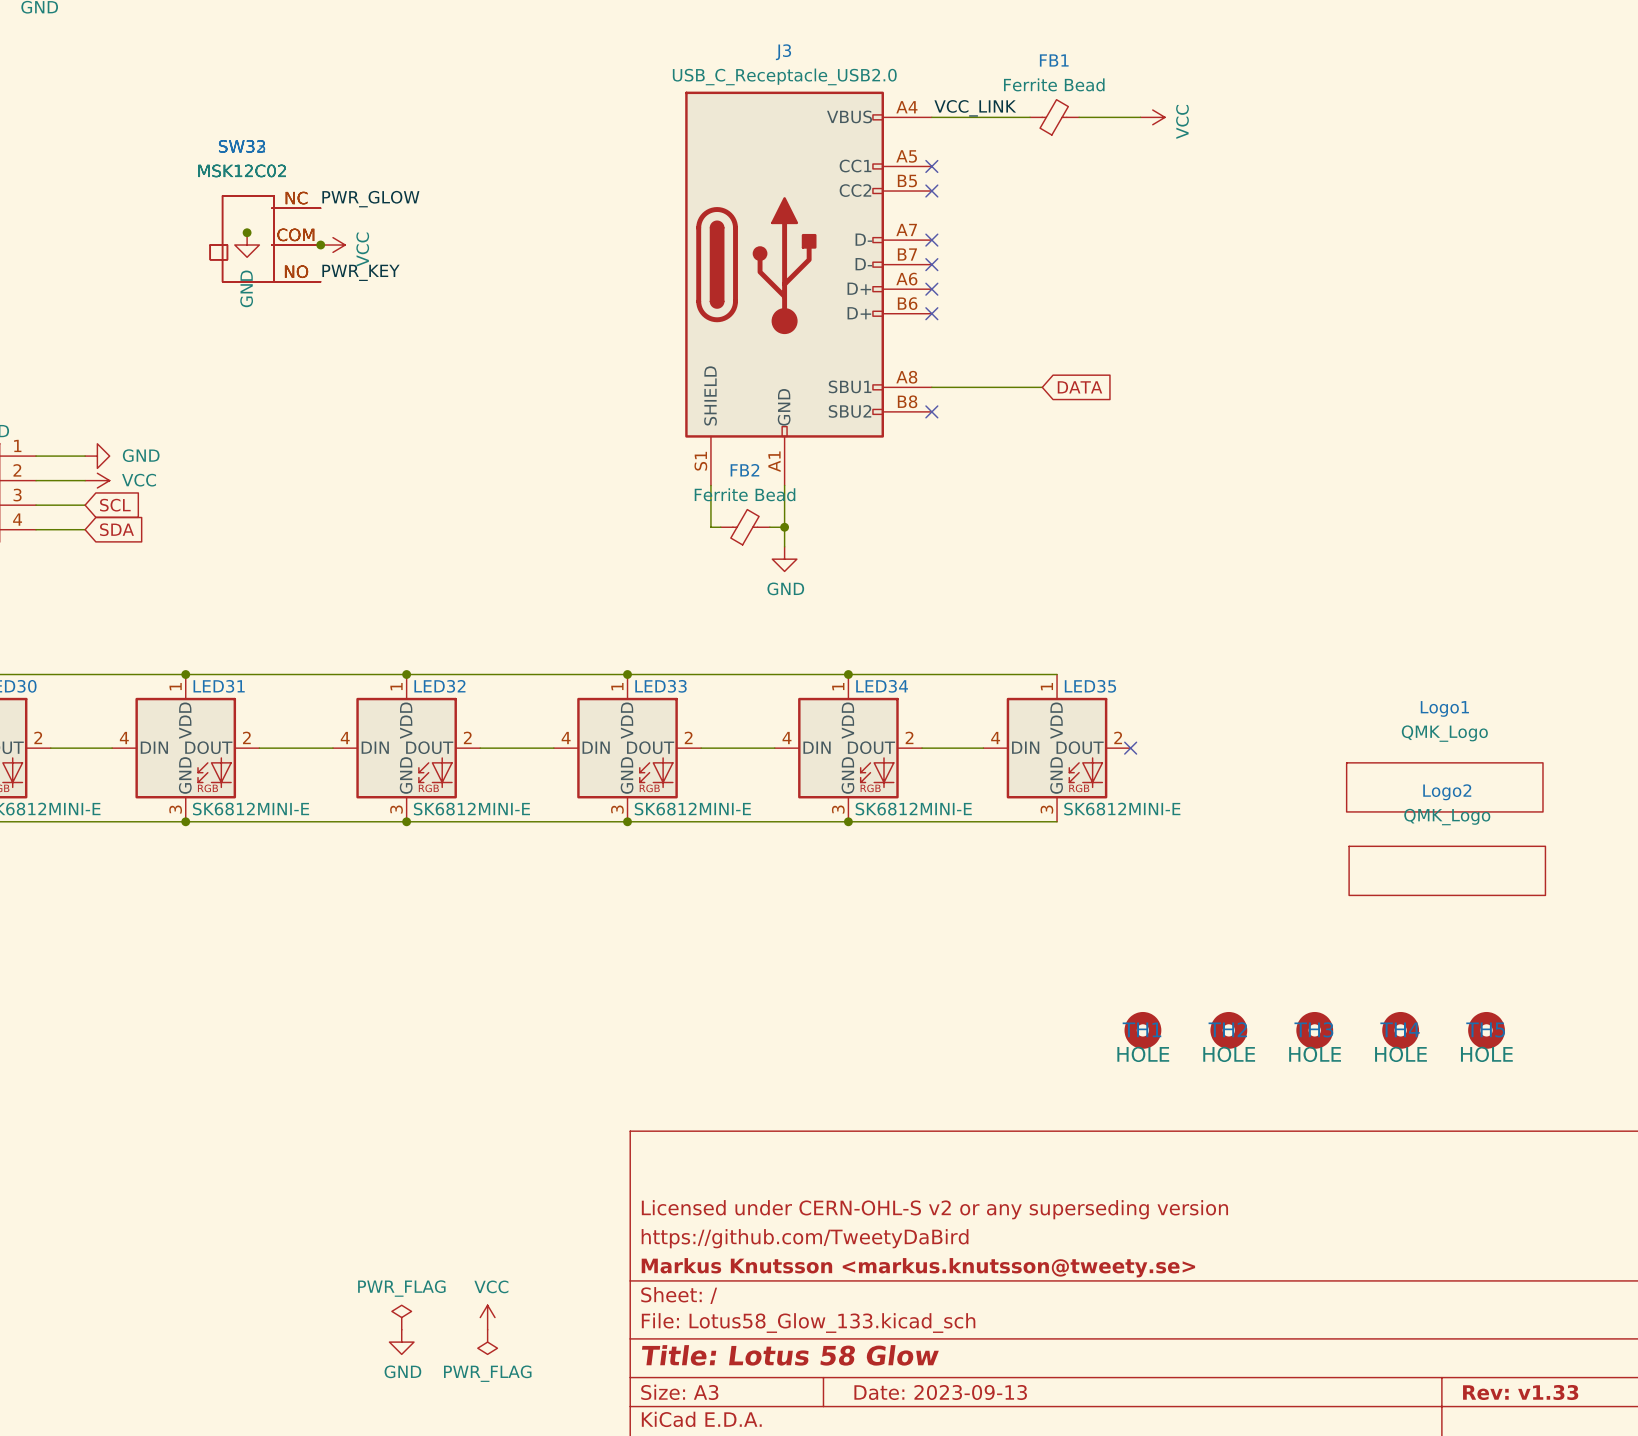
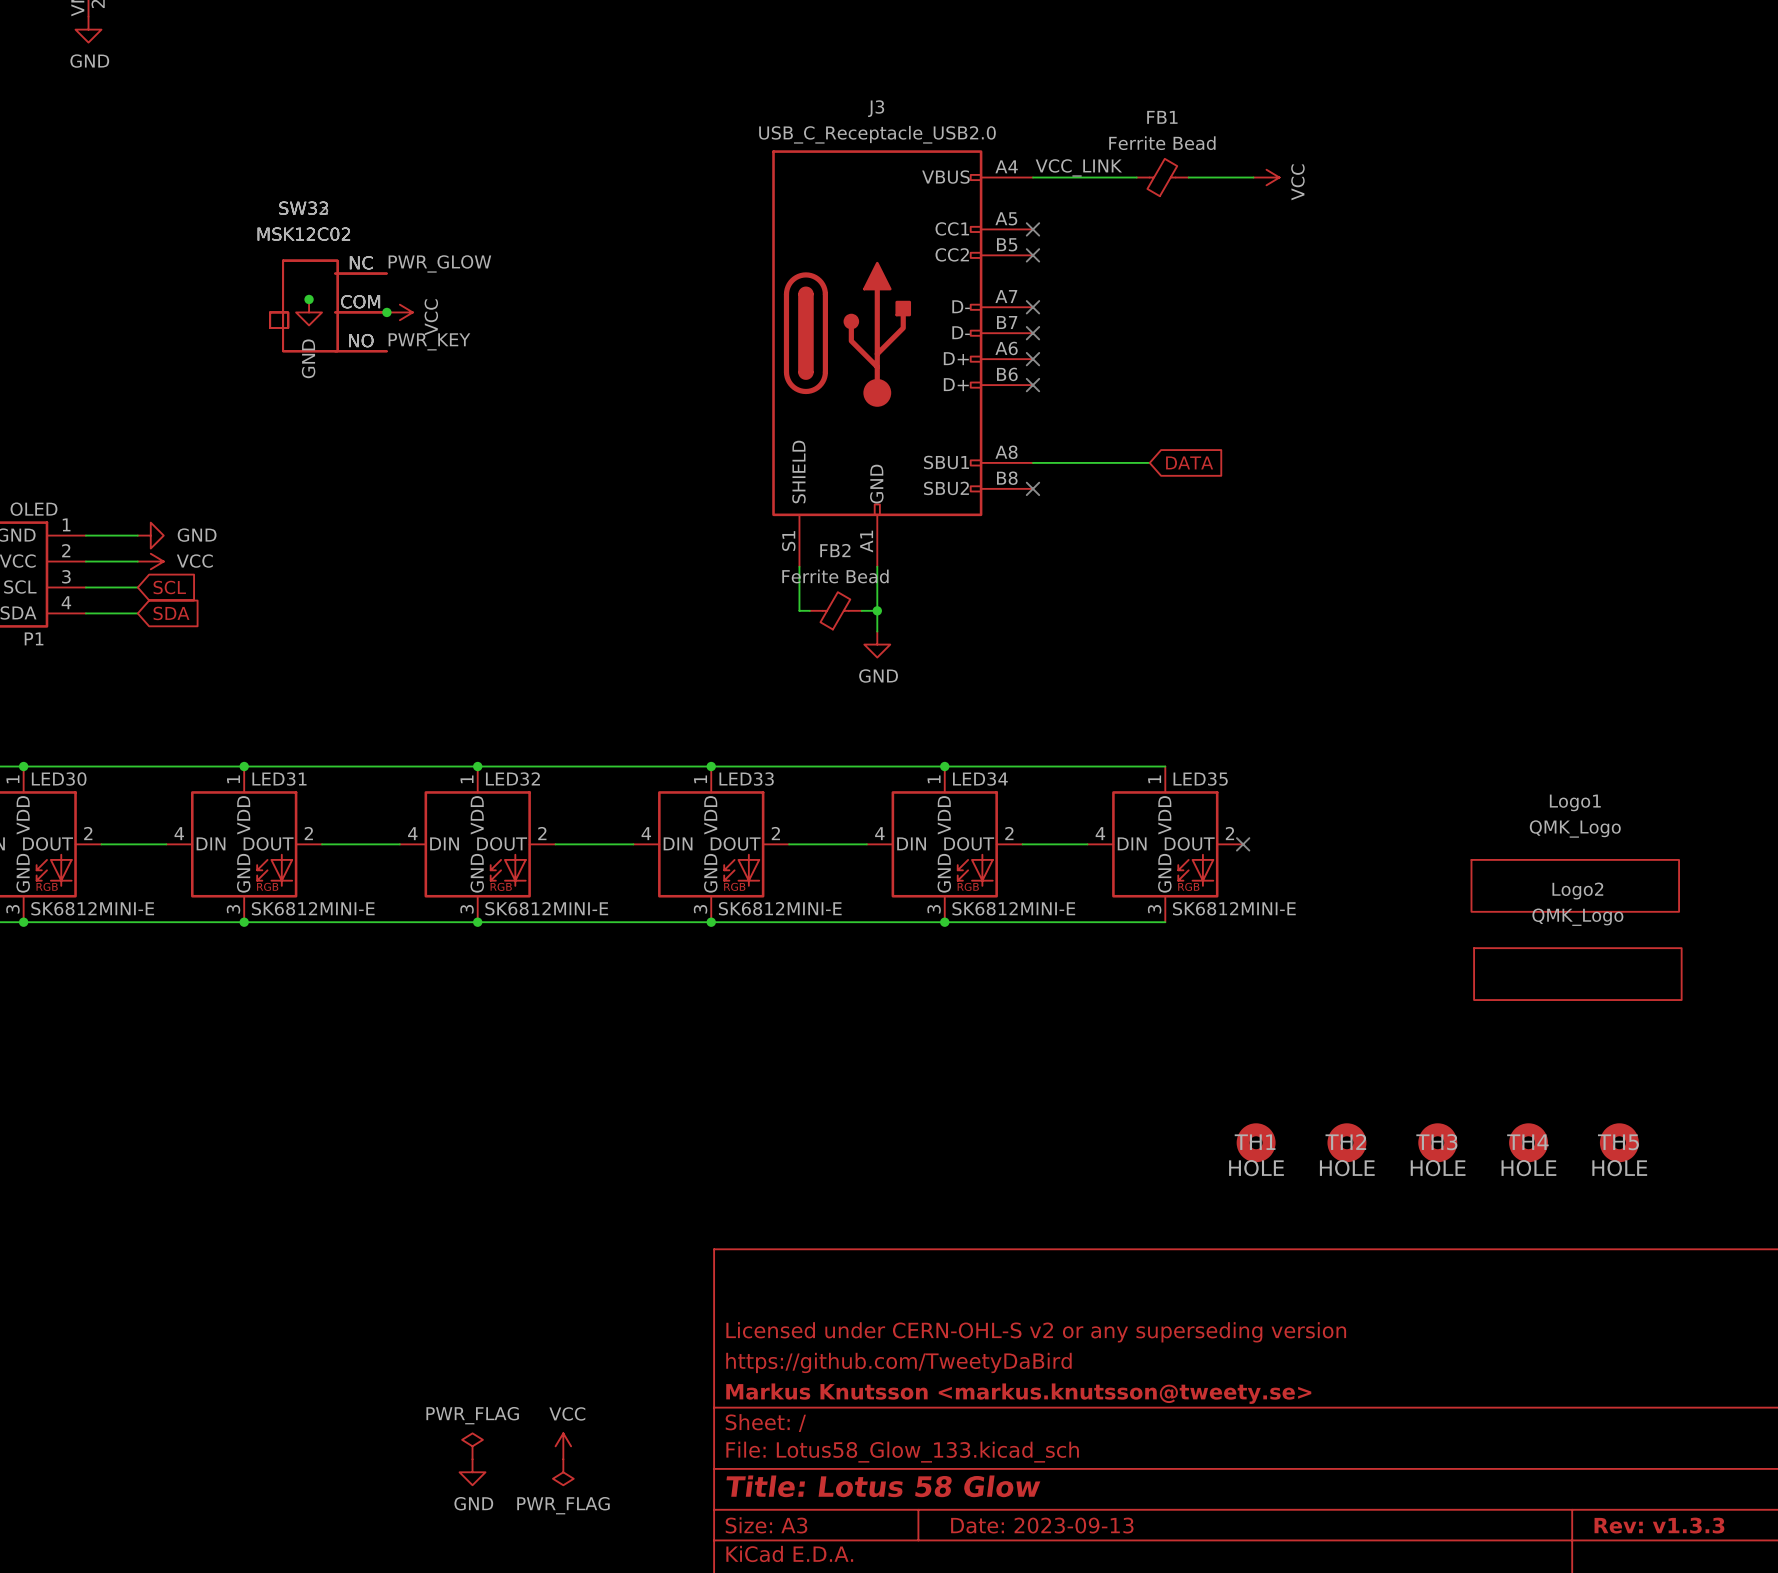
title block: Rev: v1.33 (1520, 1392) -> Rev: v1.3.3 (1659, 1525)

